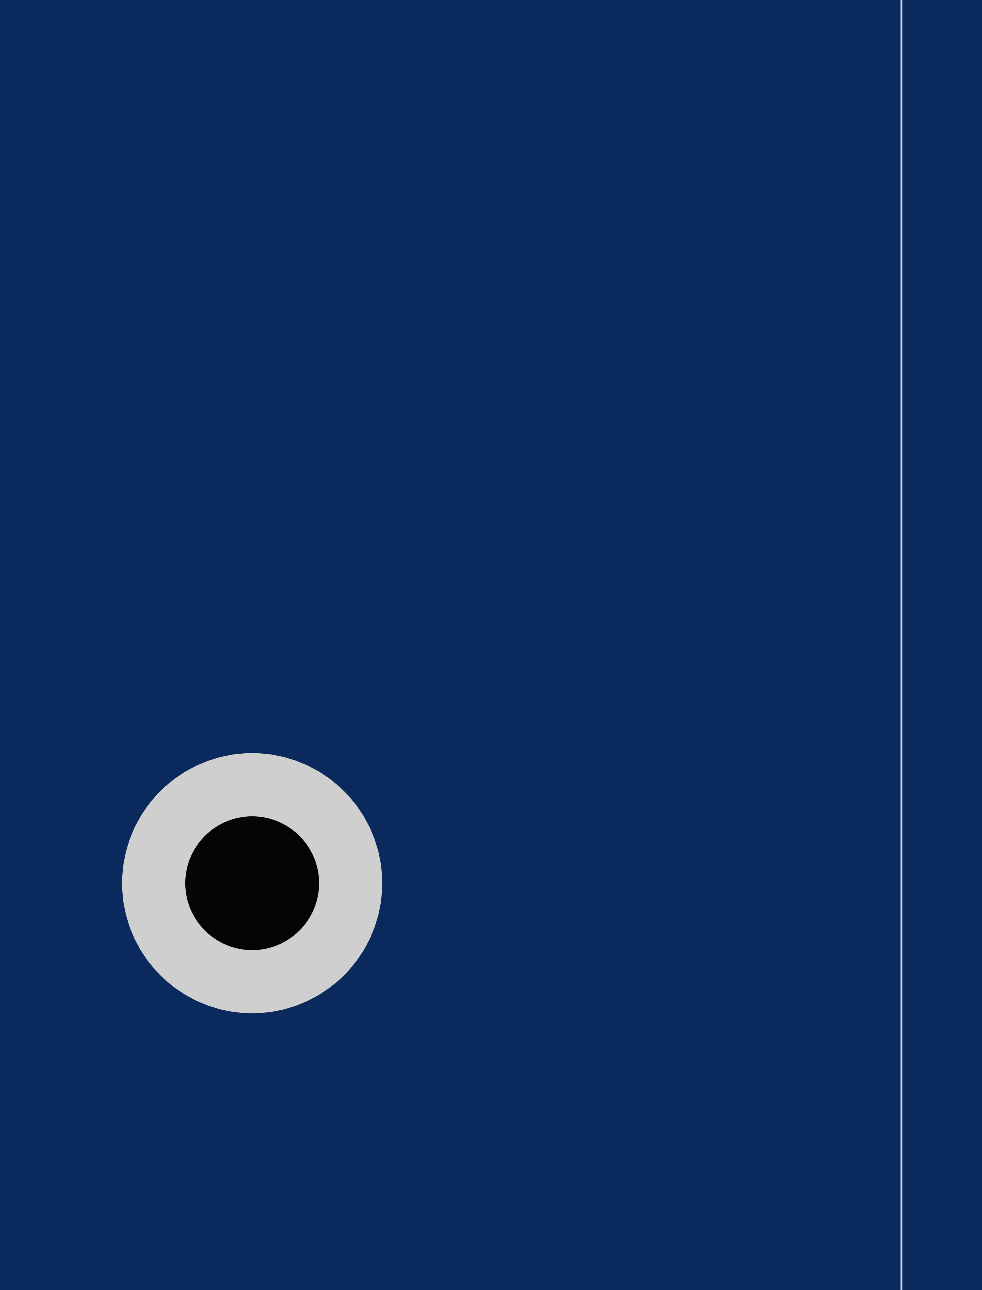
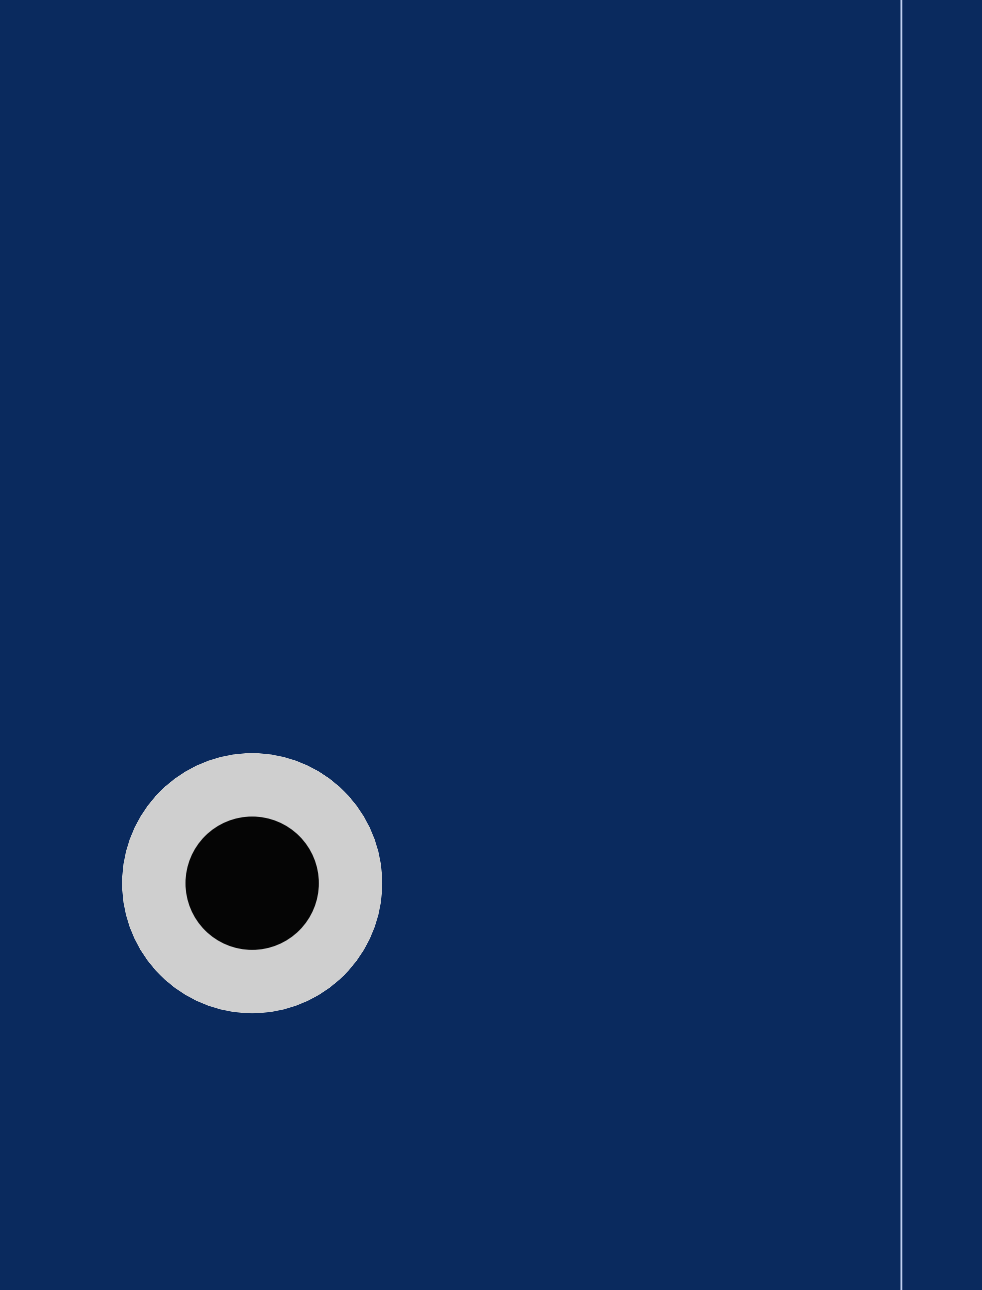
part: none -> (252, 883)

